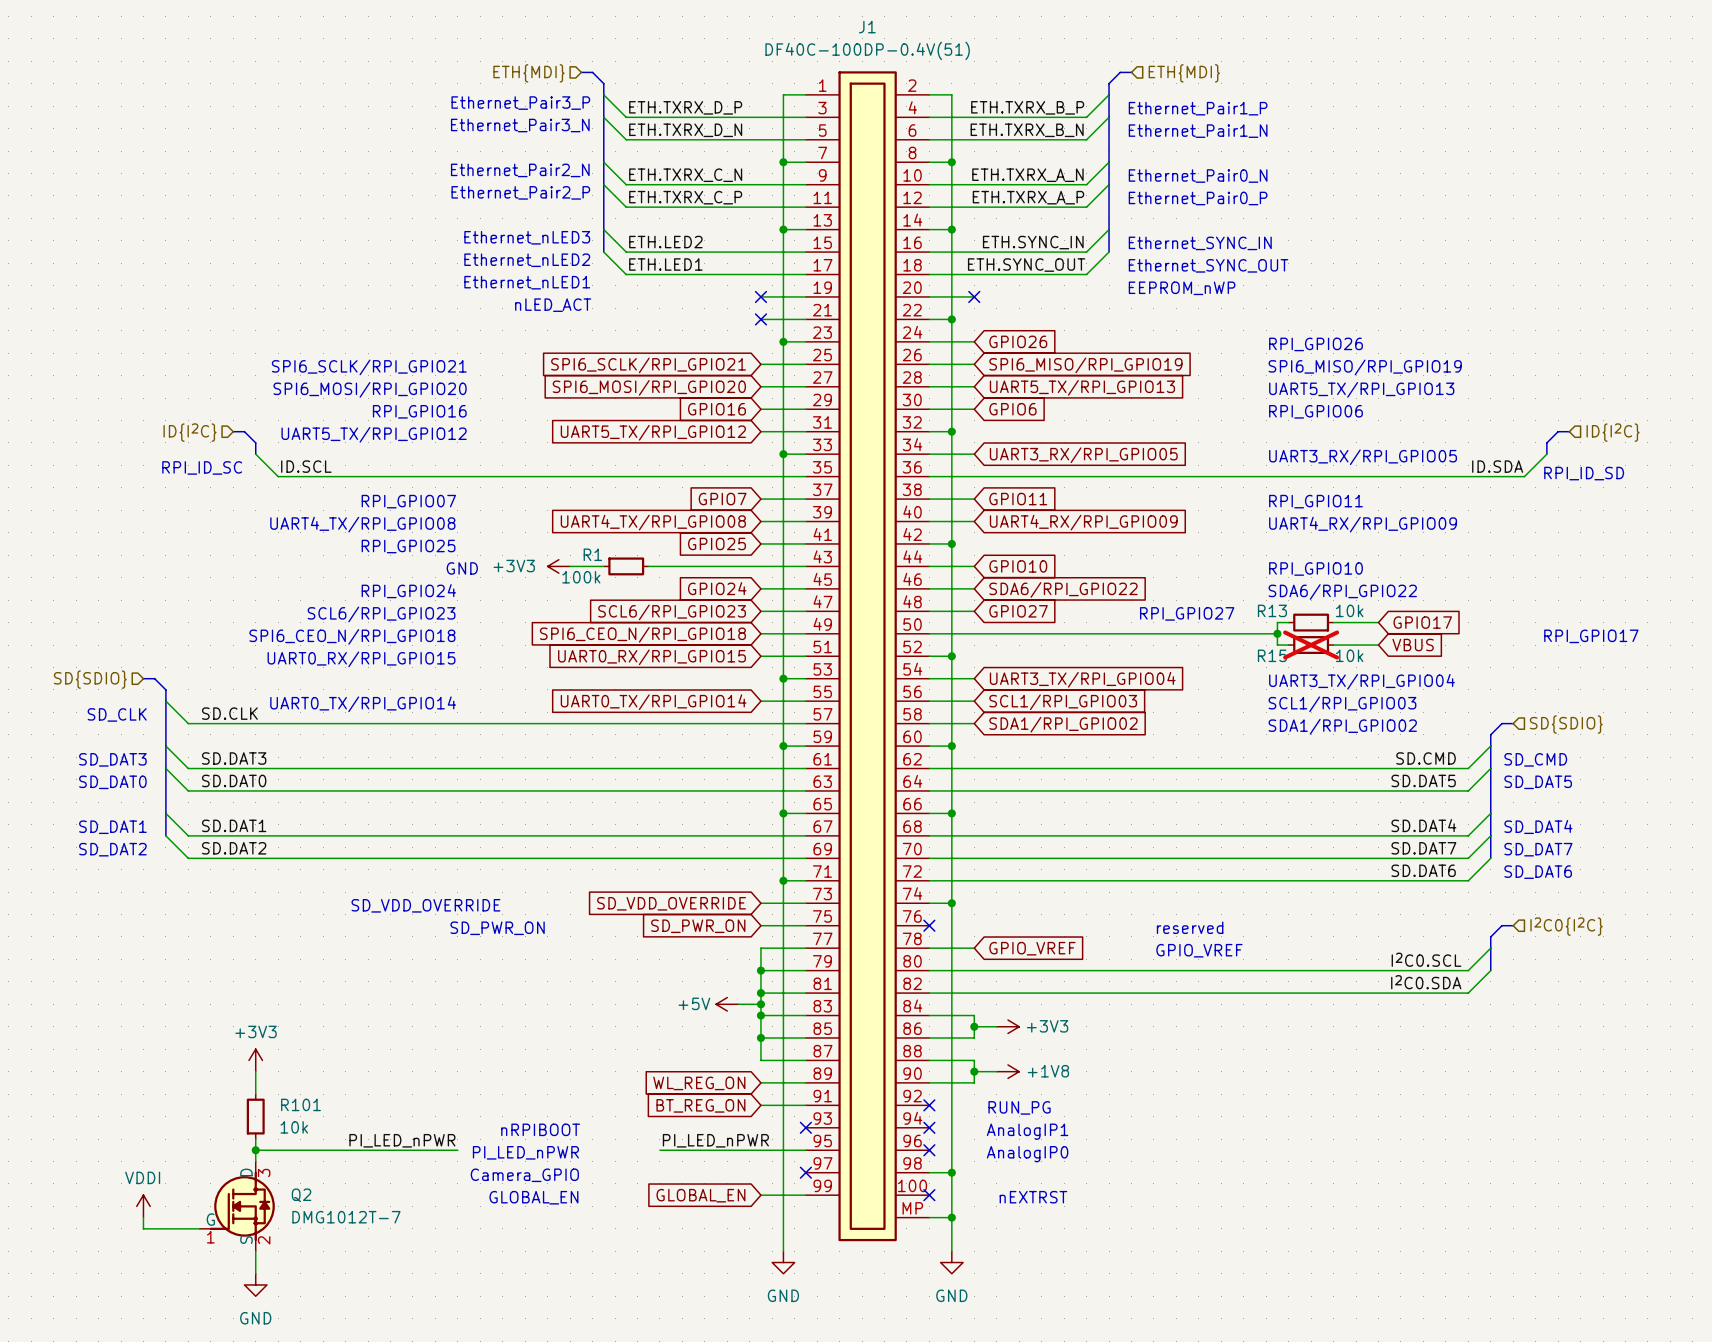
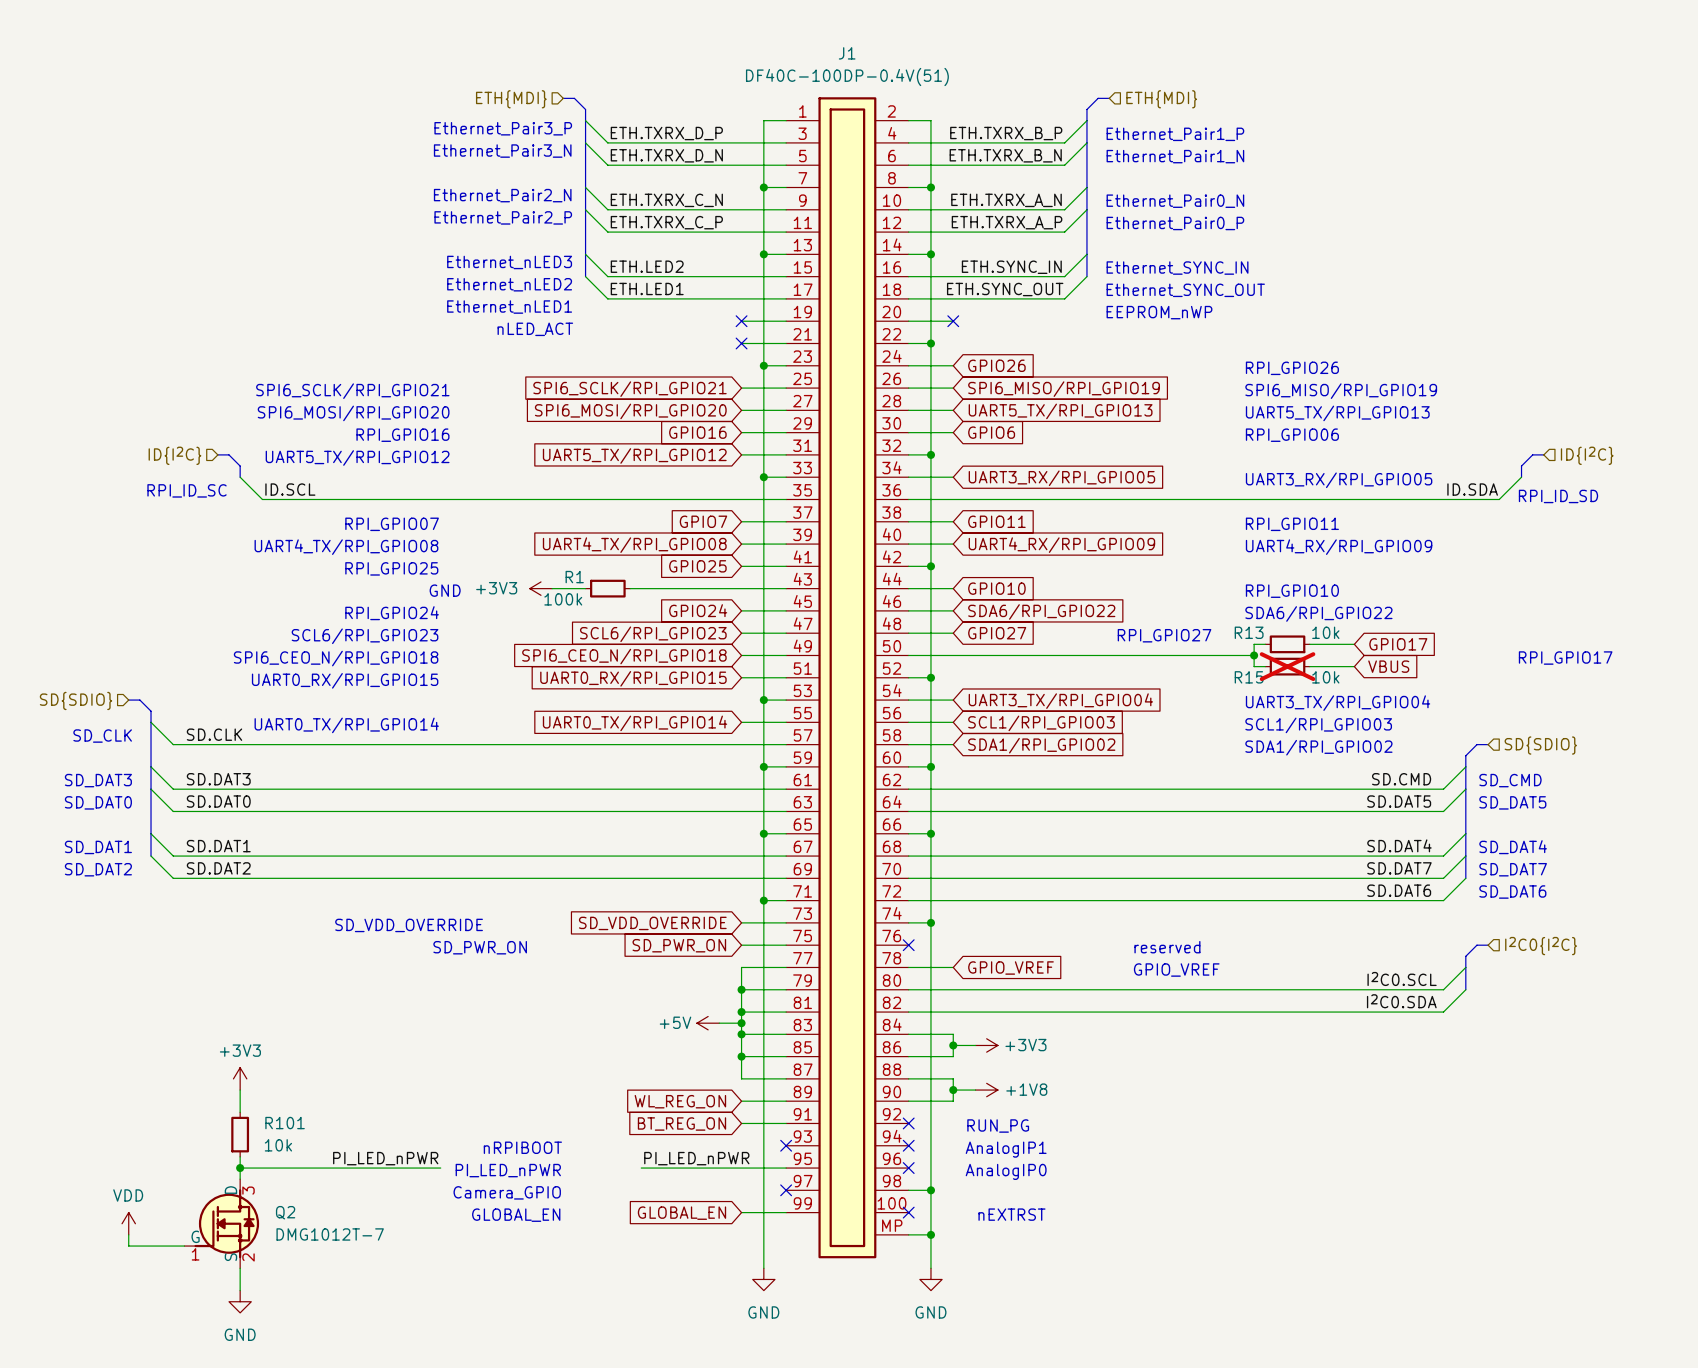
power symbol: VDDI (143, 1206) -> VDD (128, 1223)

